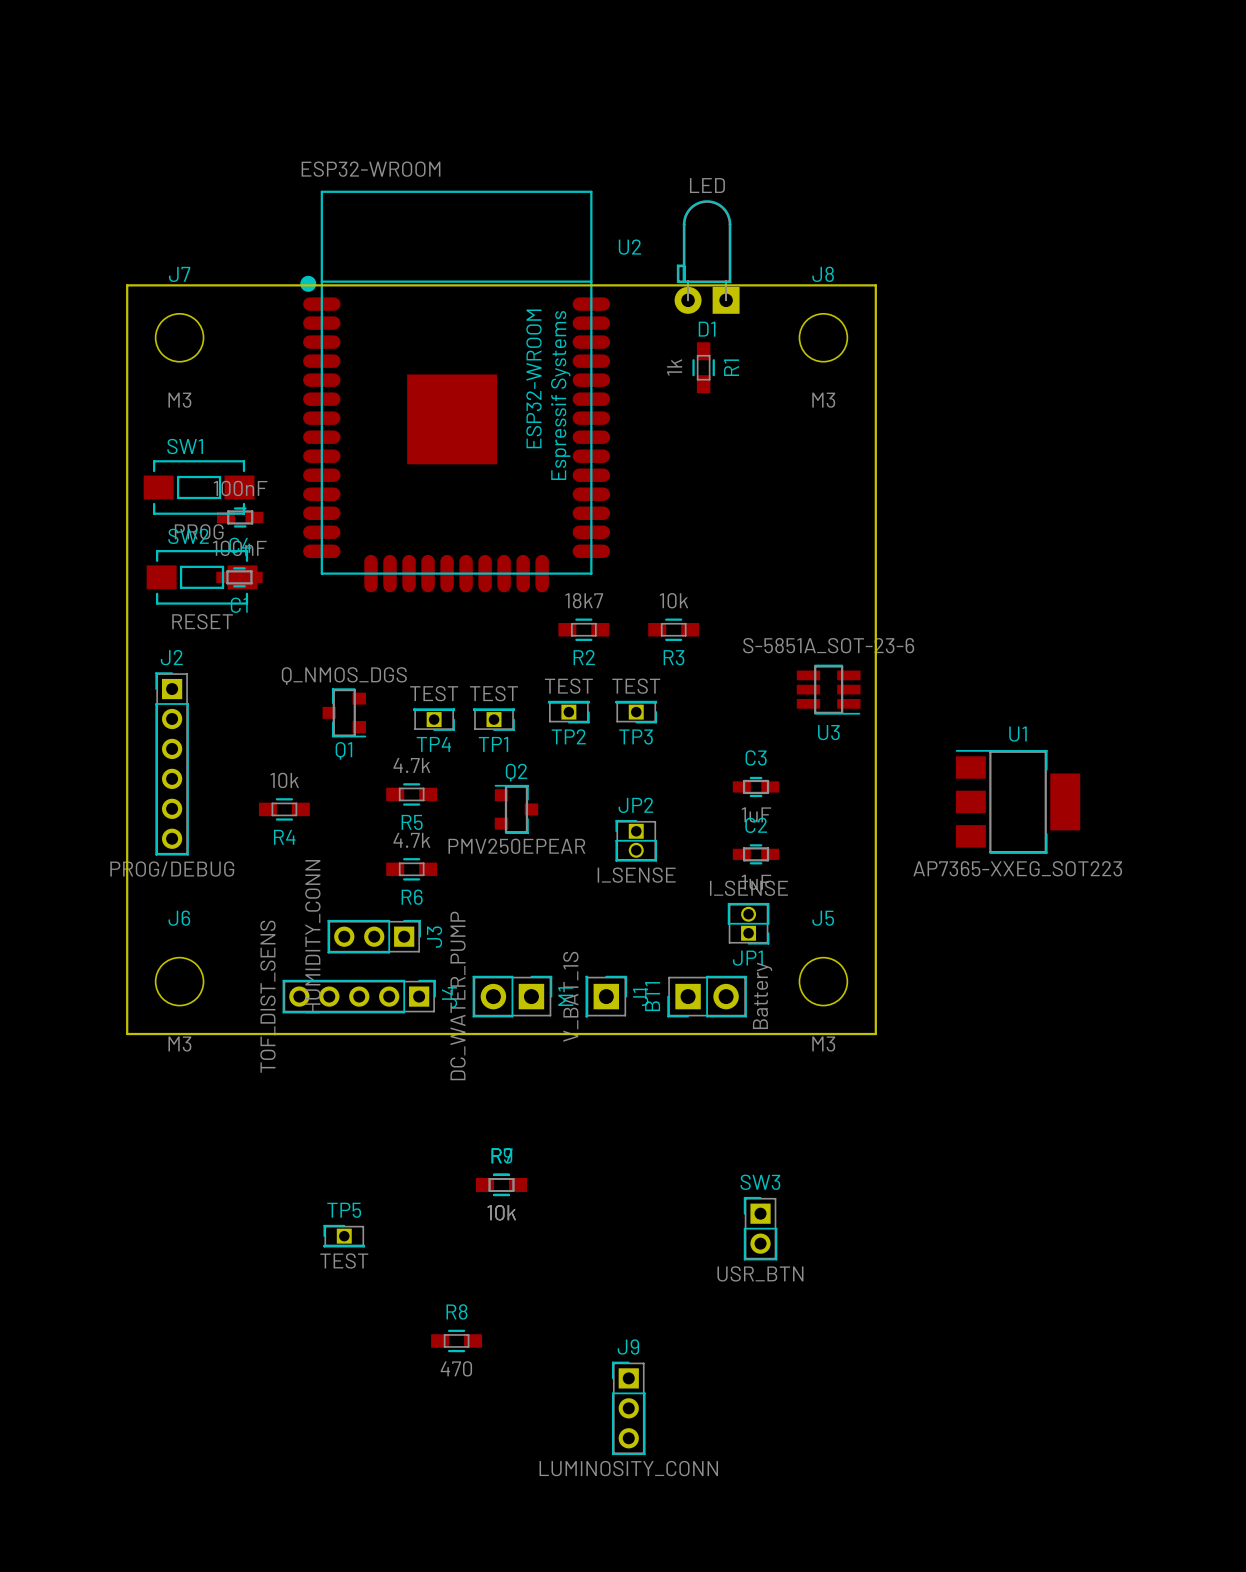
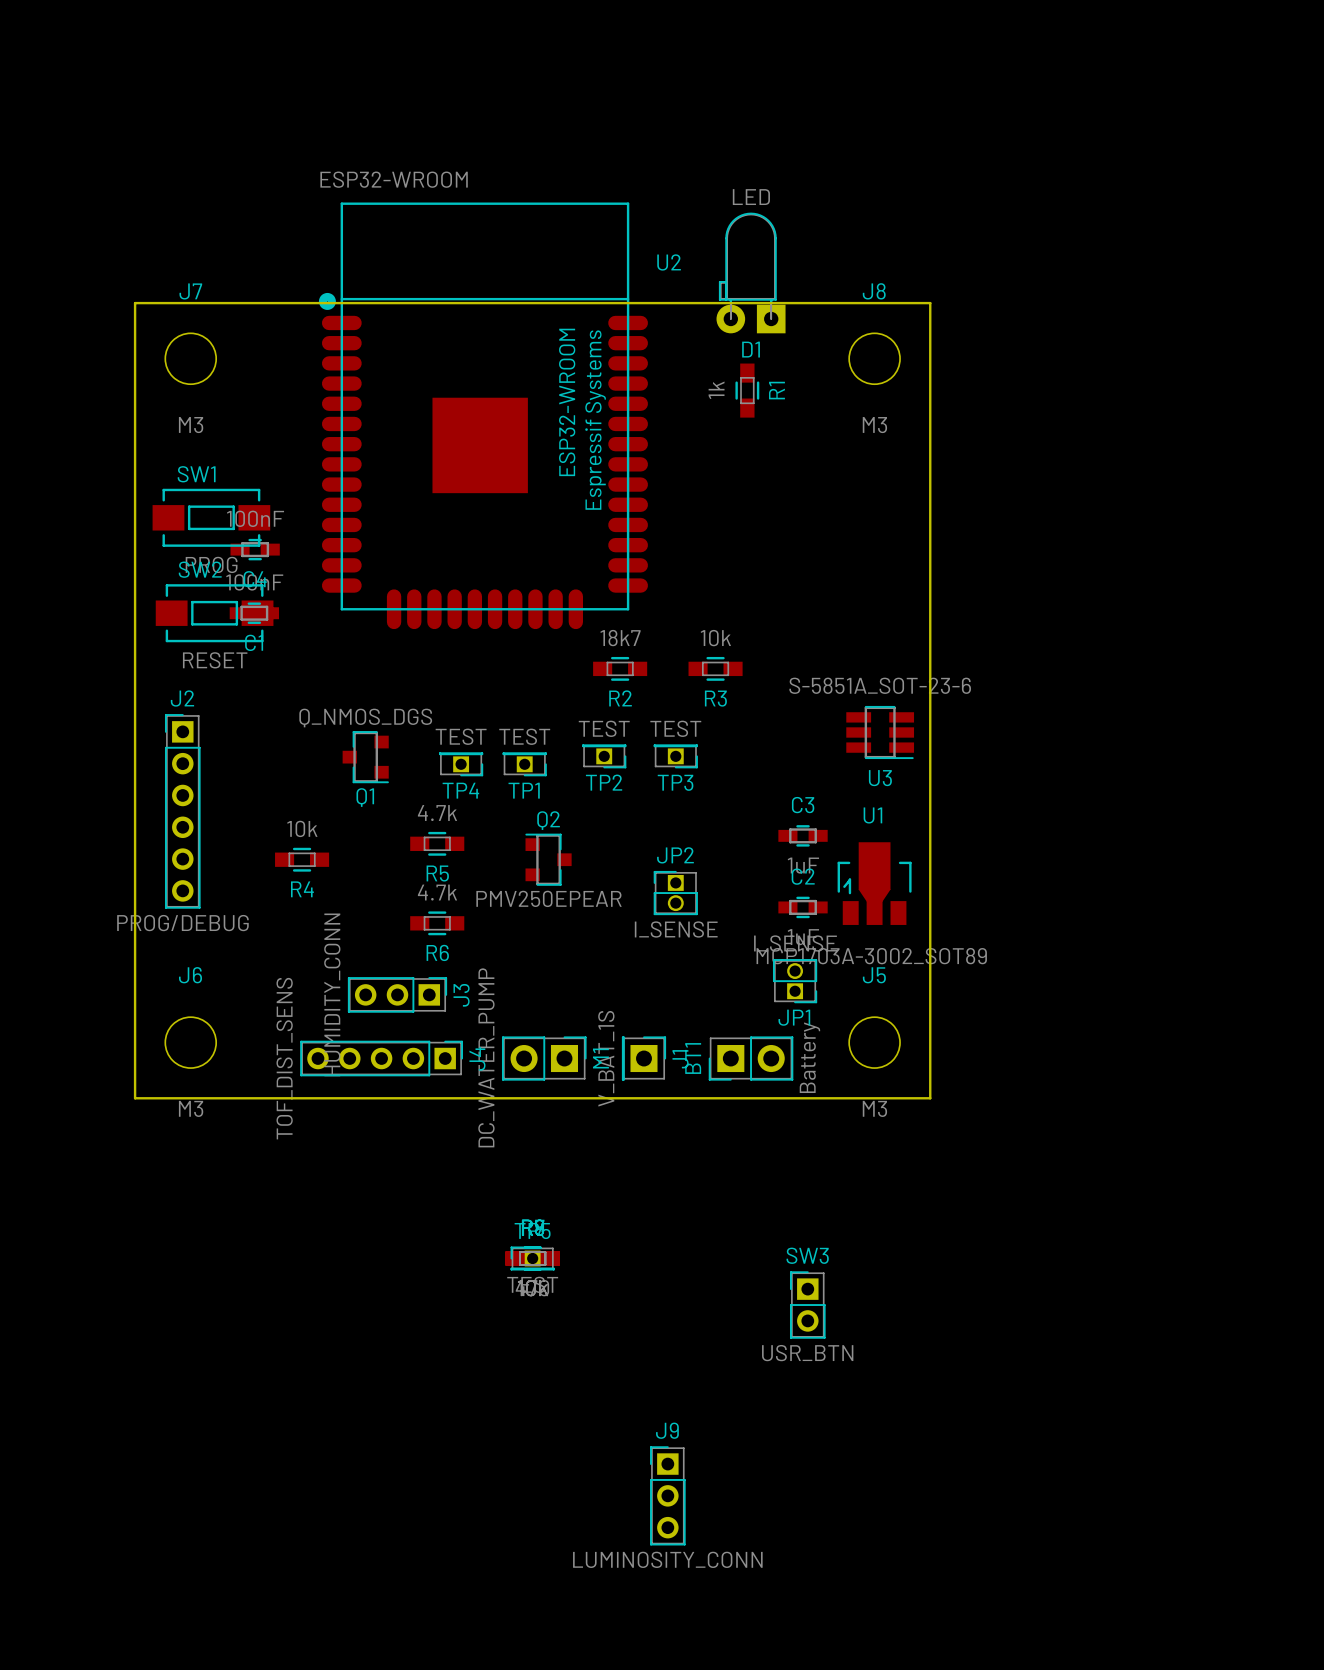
U1 footprint: [955, 749, 1081, 854] -> [837, 842, 912, 925]
U1 value: AP7365-XXEG_SOT223 (1017, 868) -> MCP1703A-3002_SOT89 (871, 956)
TP5 position: (344, 1236) -> (532, 1258)
R8 position: (456, 1340) -> (532, 1258)

